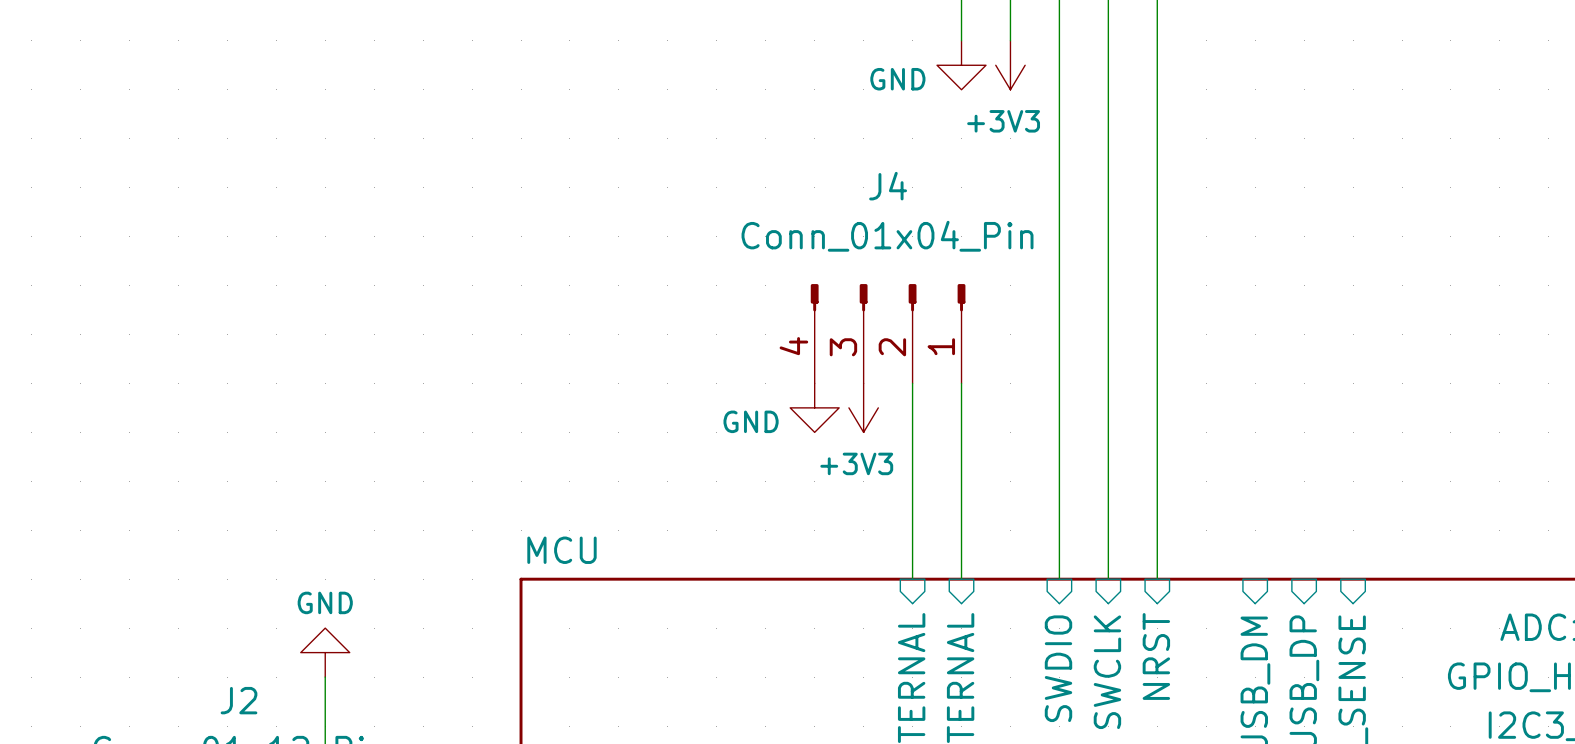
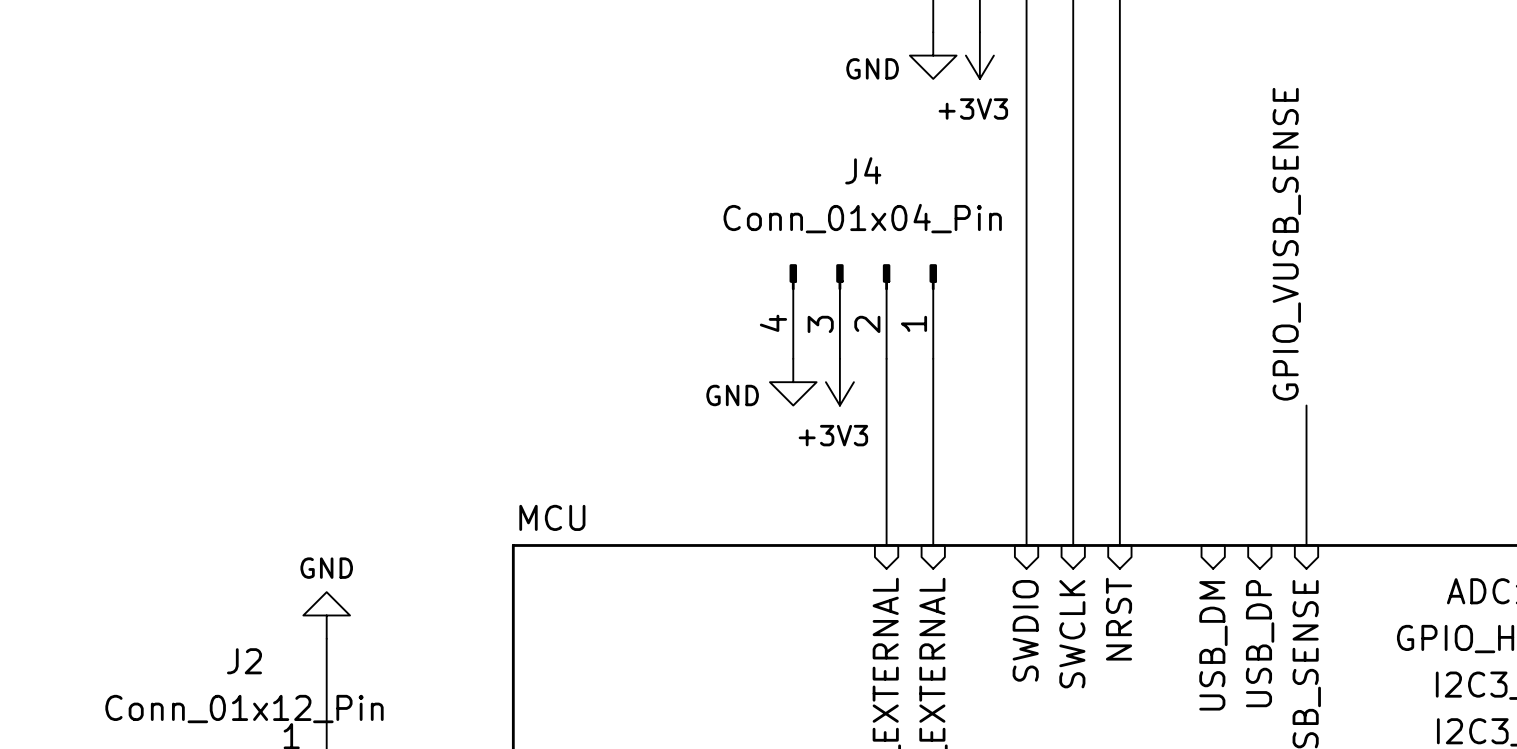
label: none -> GPIO_VUSB_SENSE (1286, 244)
wire: none -> (1306, 405) (1306, 545)

